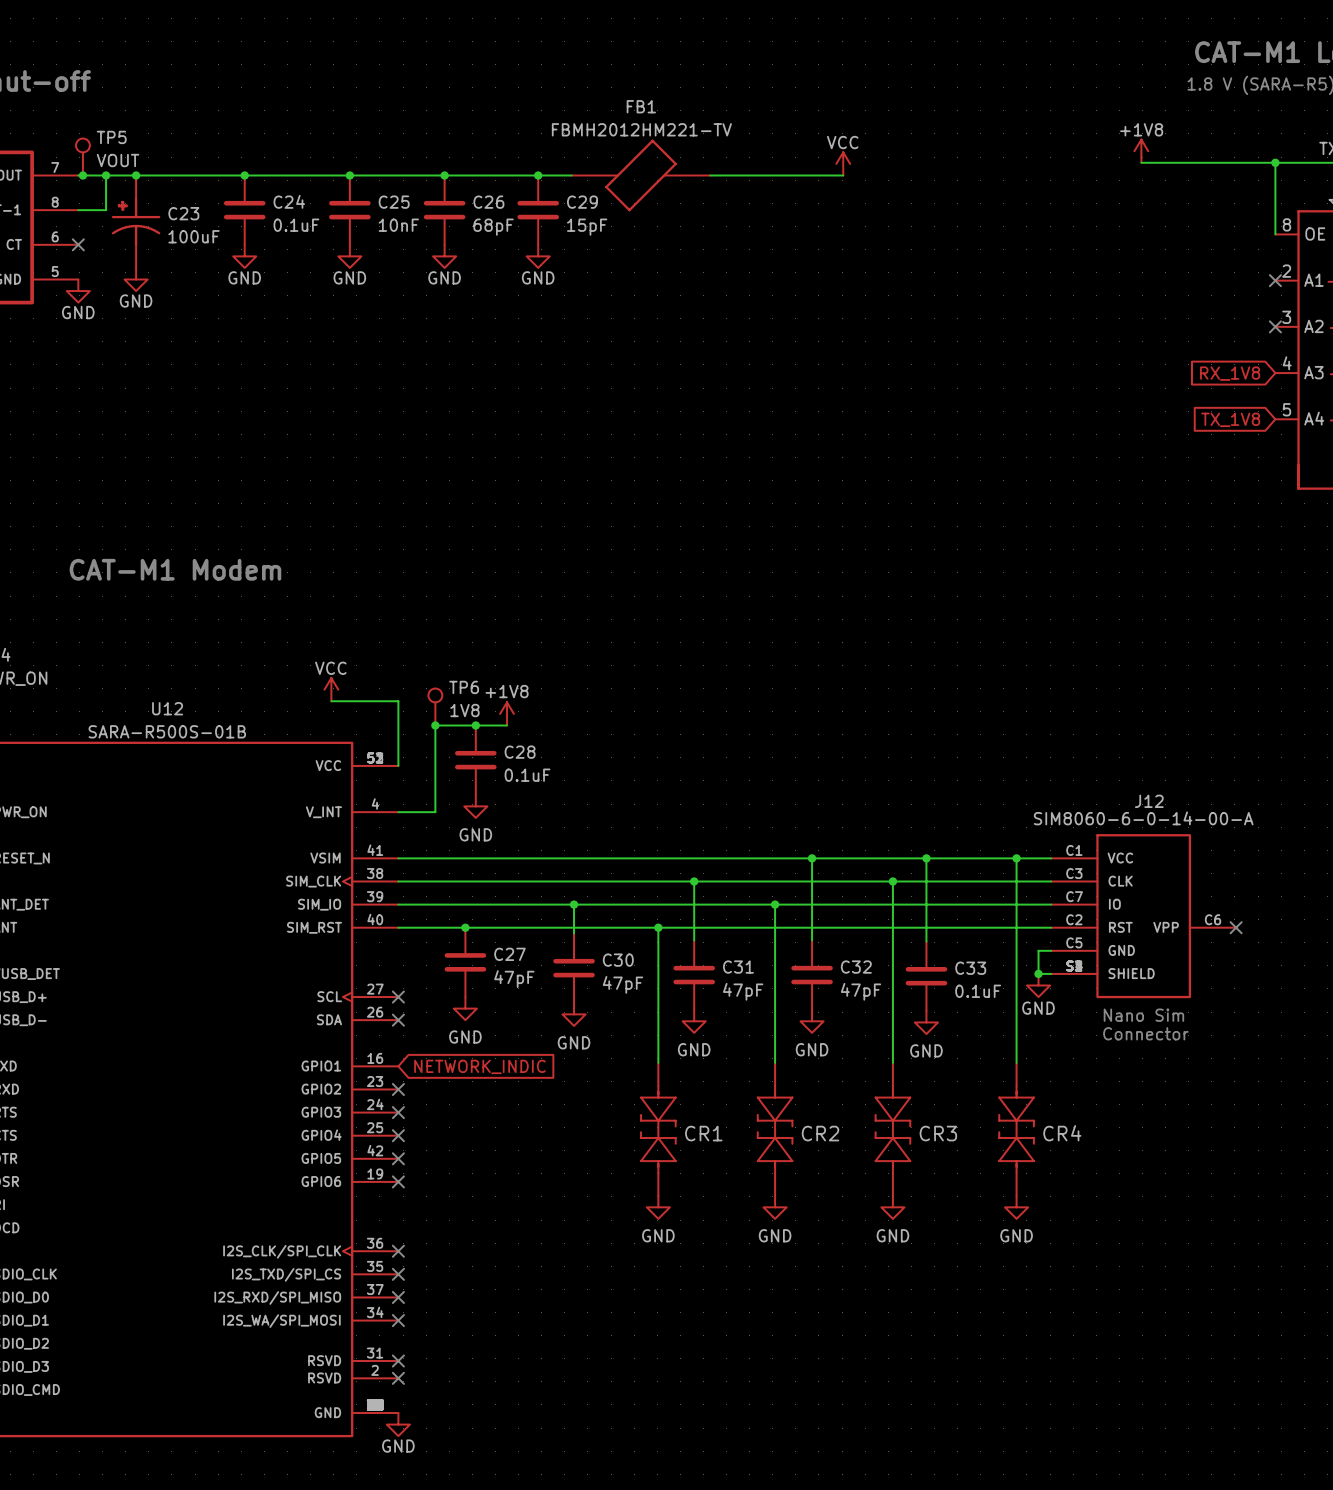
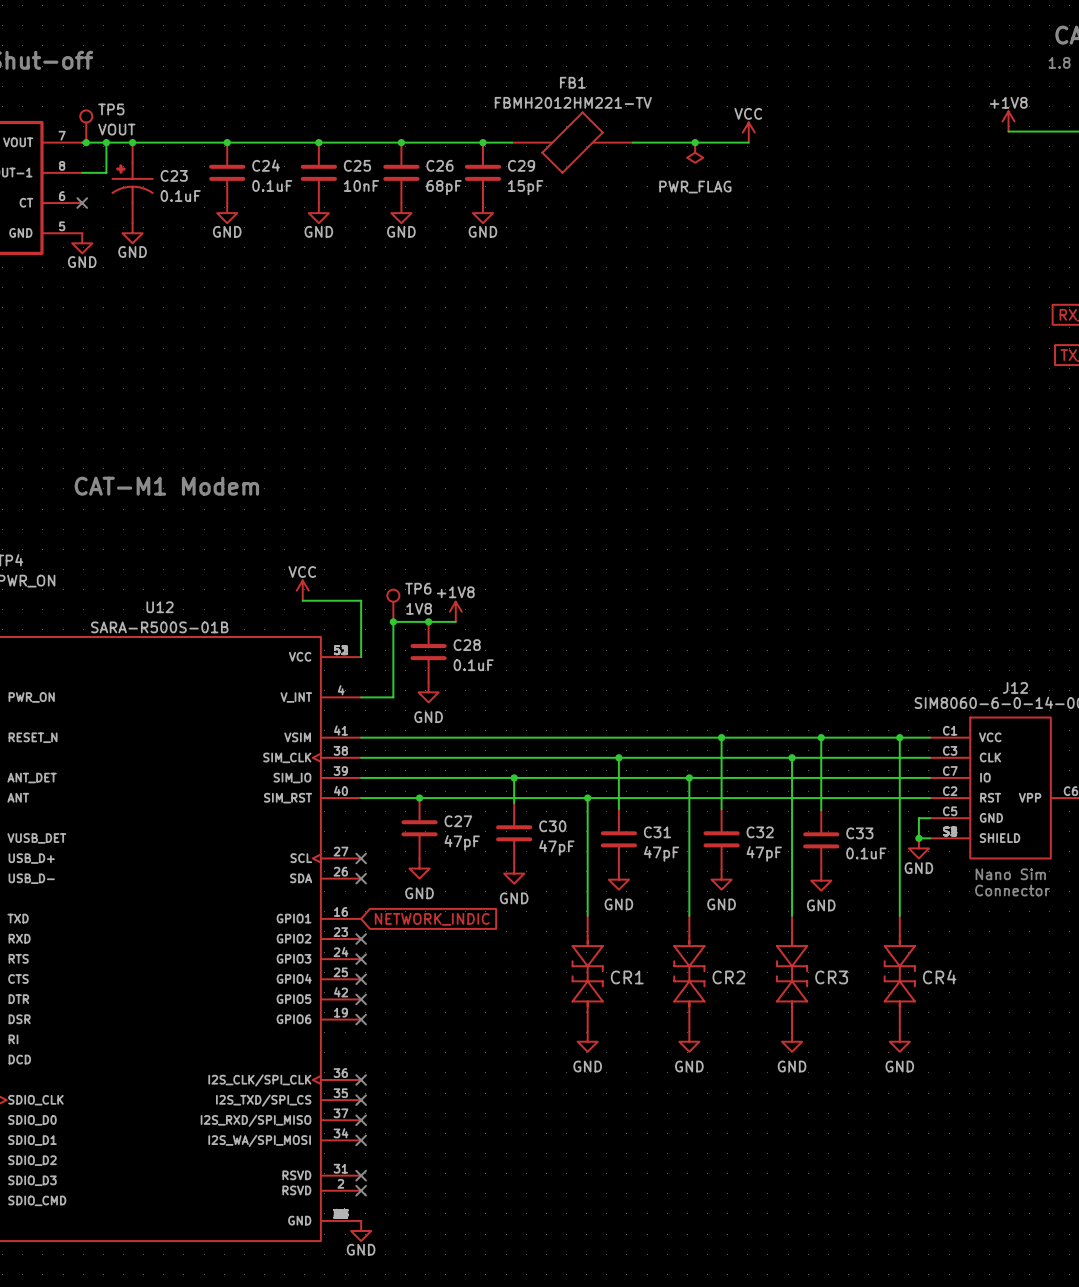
junction: none -> (695, 142)
power symbol: none -> PWR_FLAG (695, 152)
C23 value: 100uF (194, 236) -> 0.1uF (180, 196)

